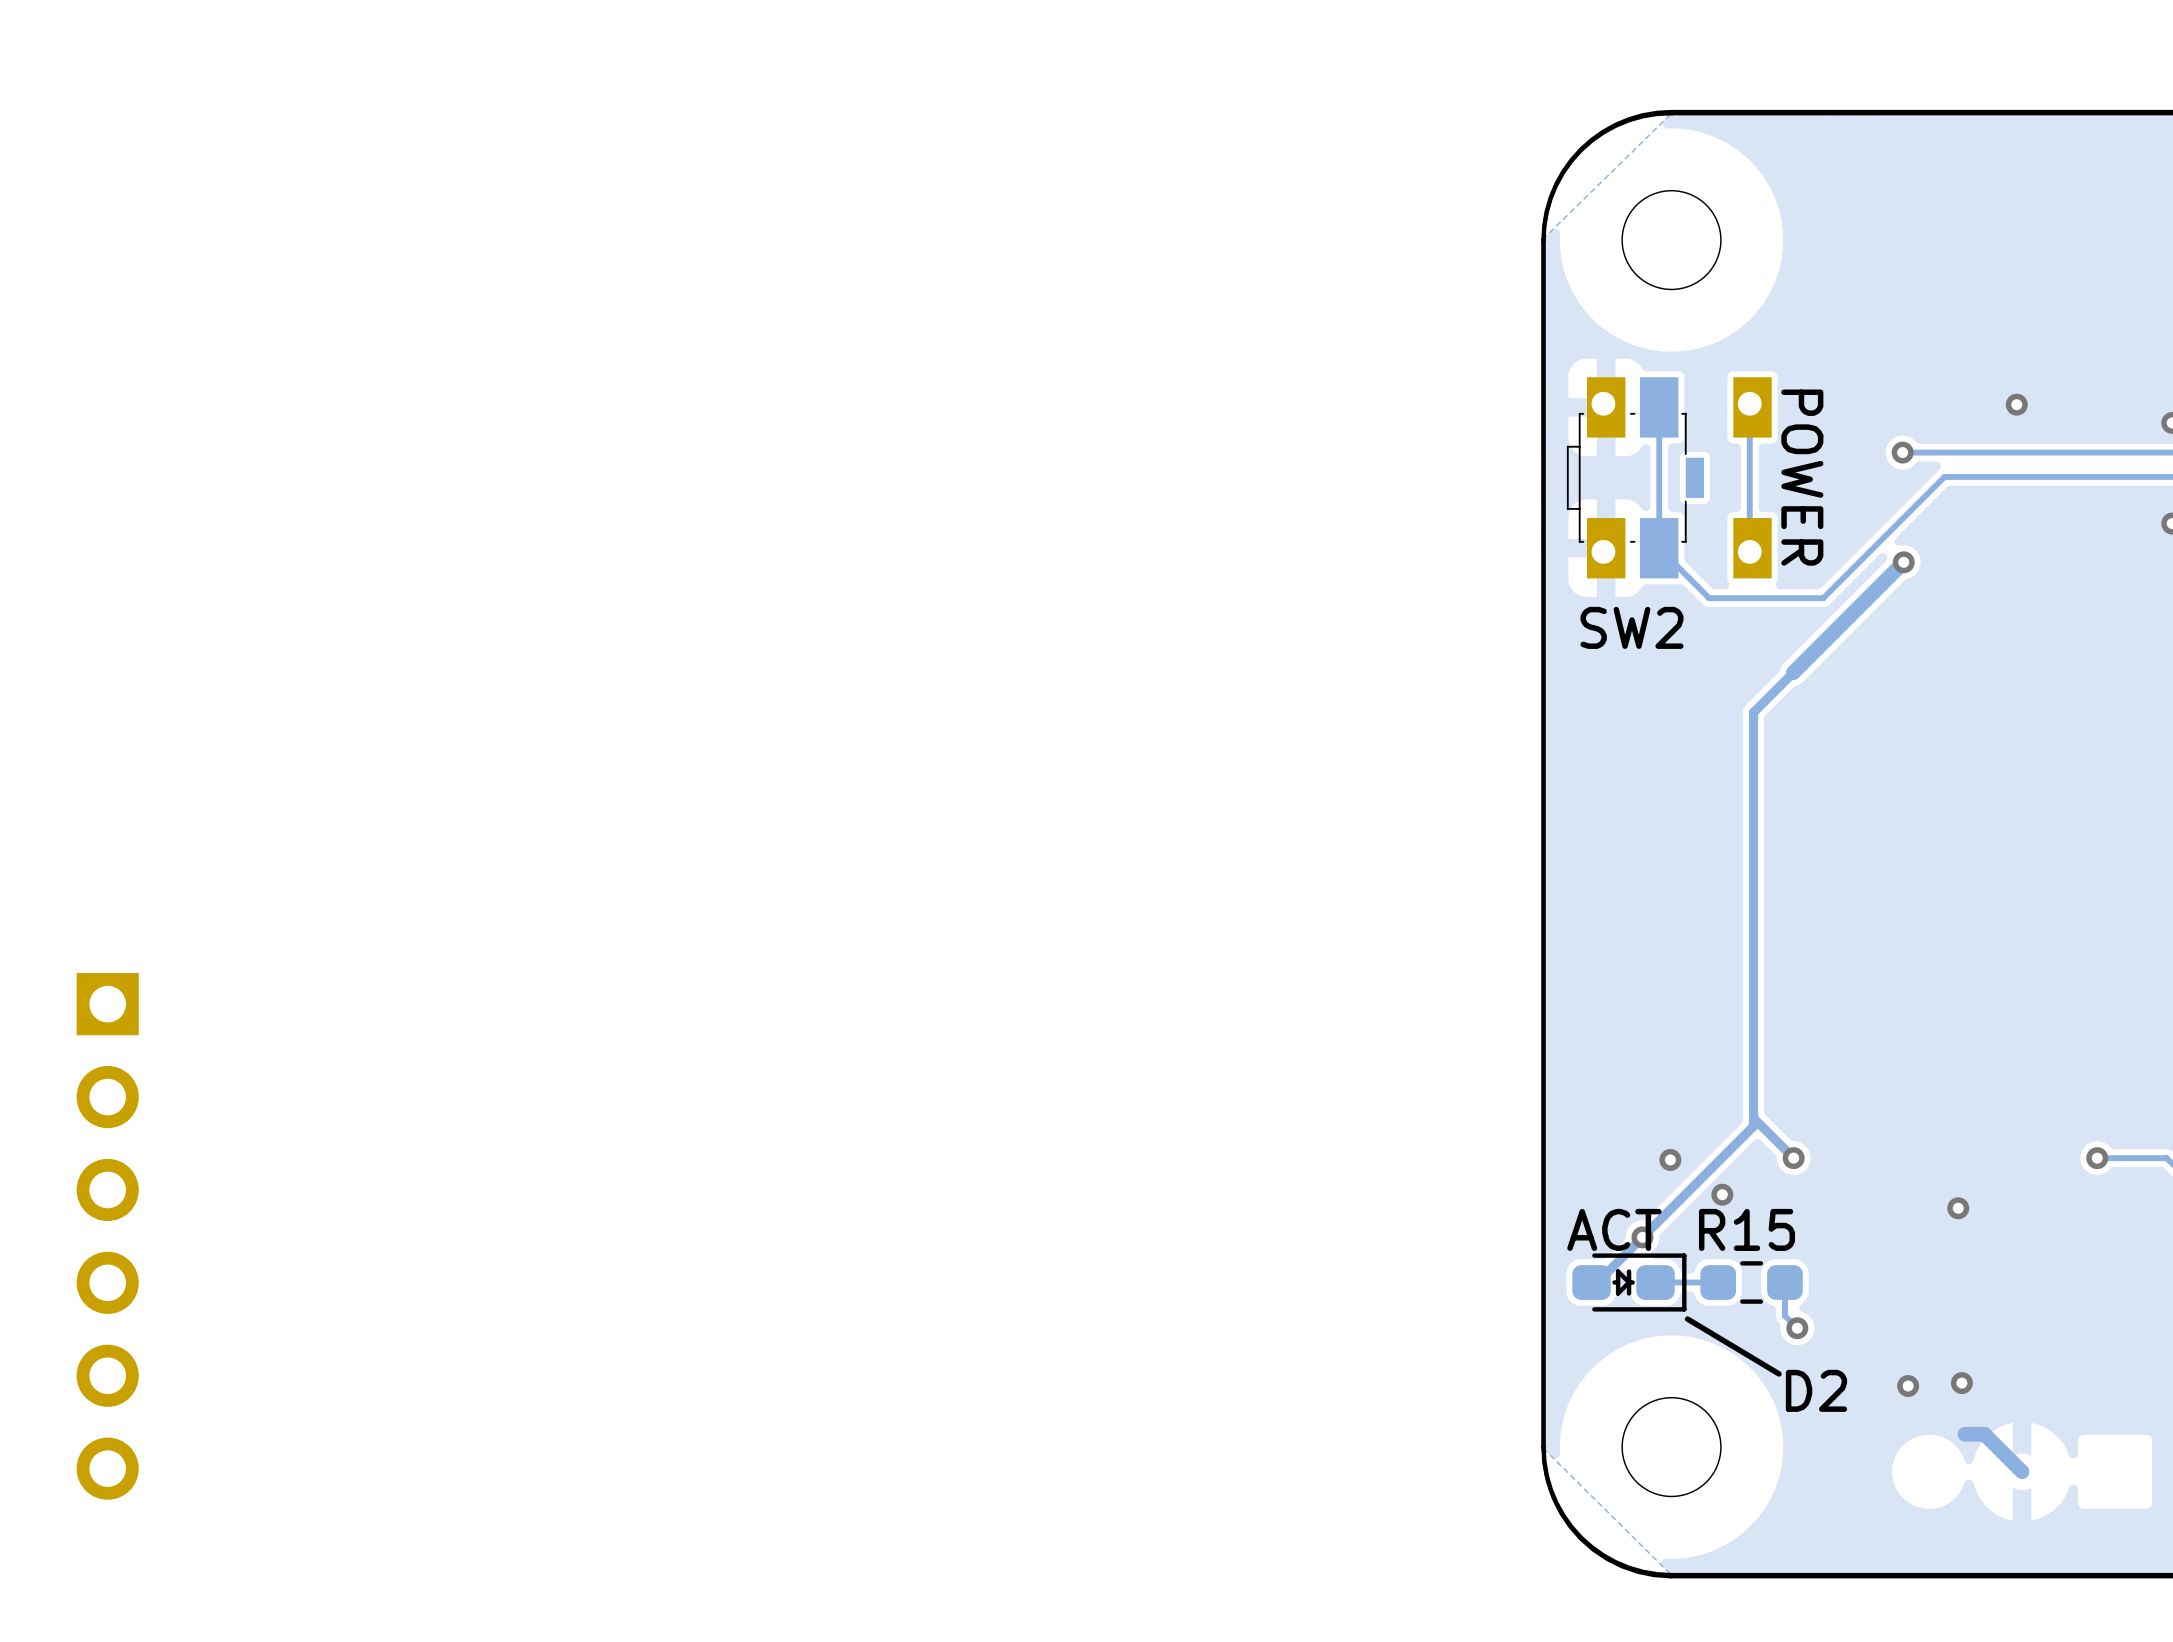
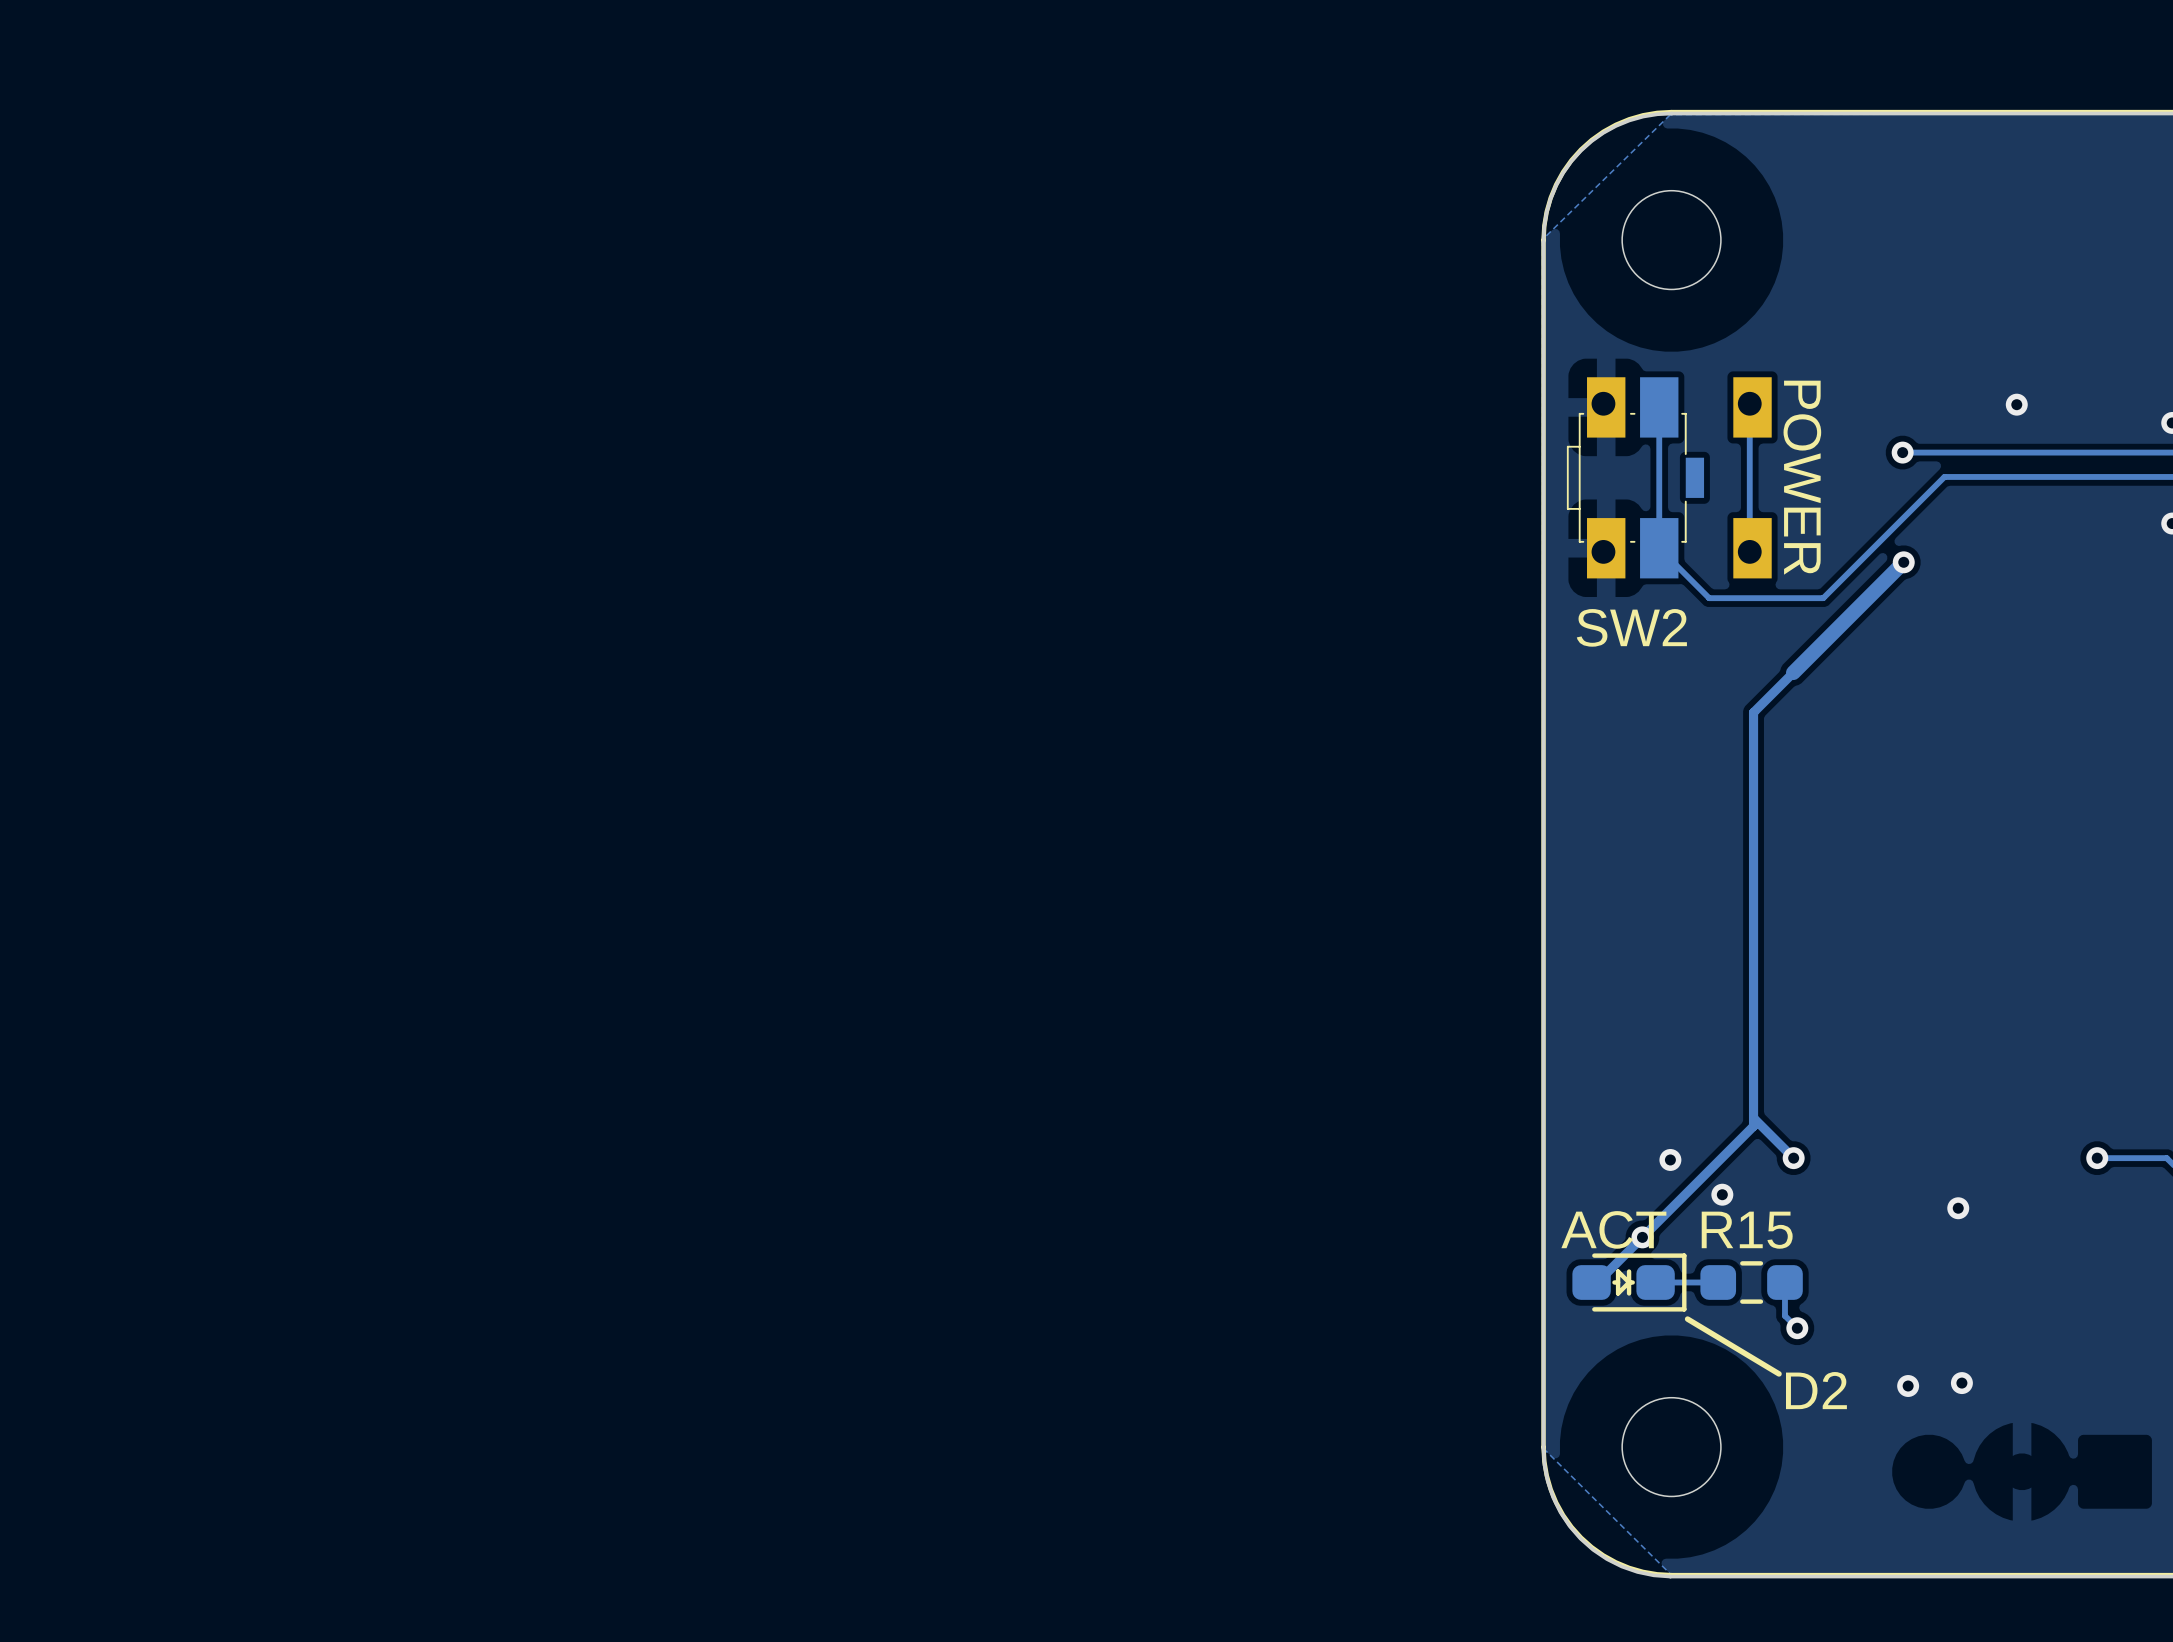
part: (107, 1236) -> none
track: (1964, 1434) (1984, 1434) (2022, 1471) -> none

